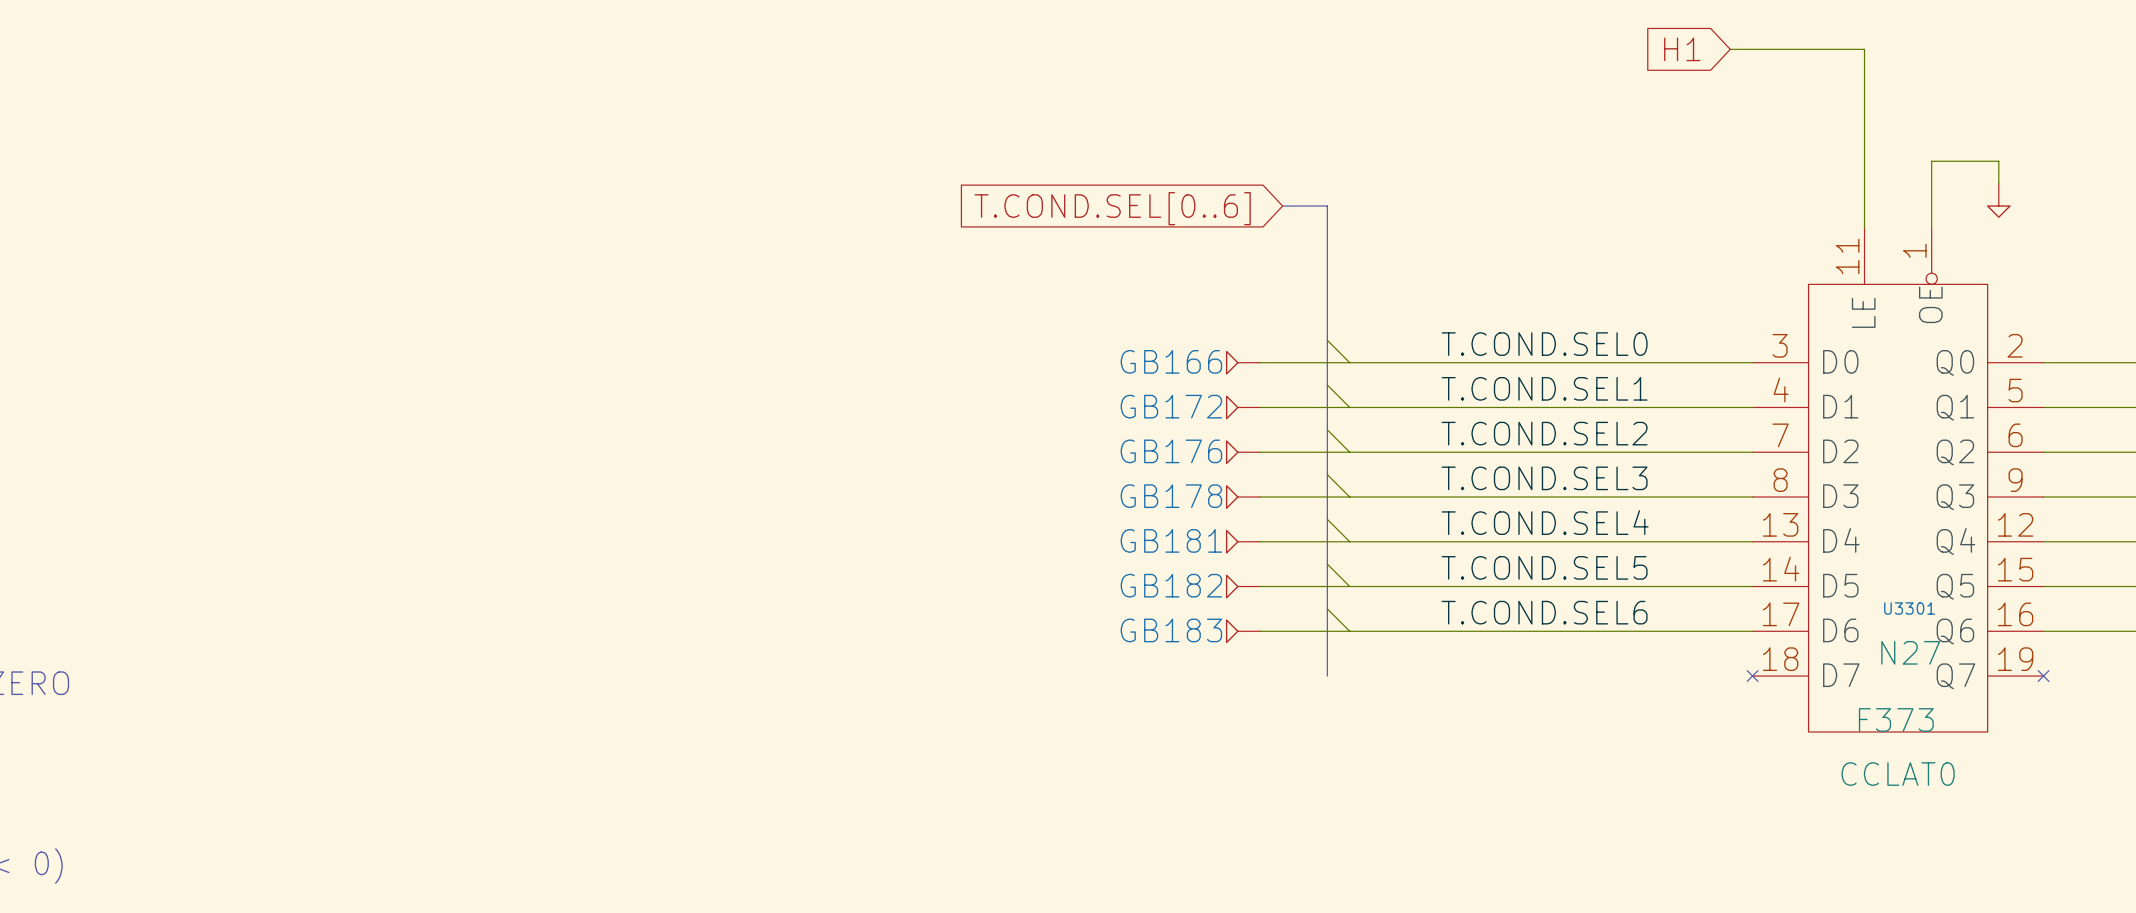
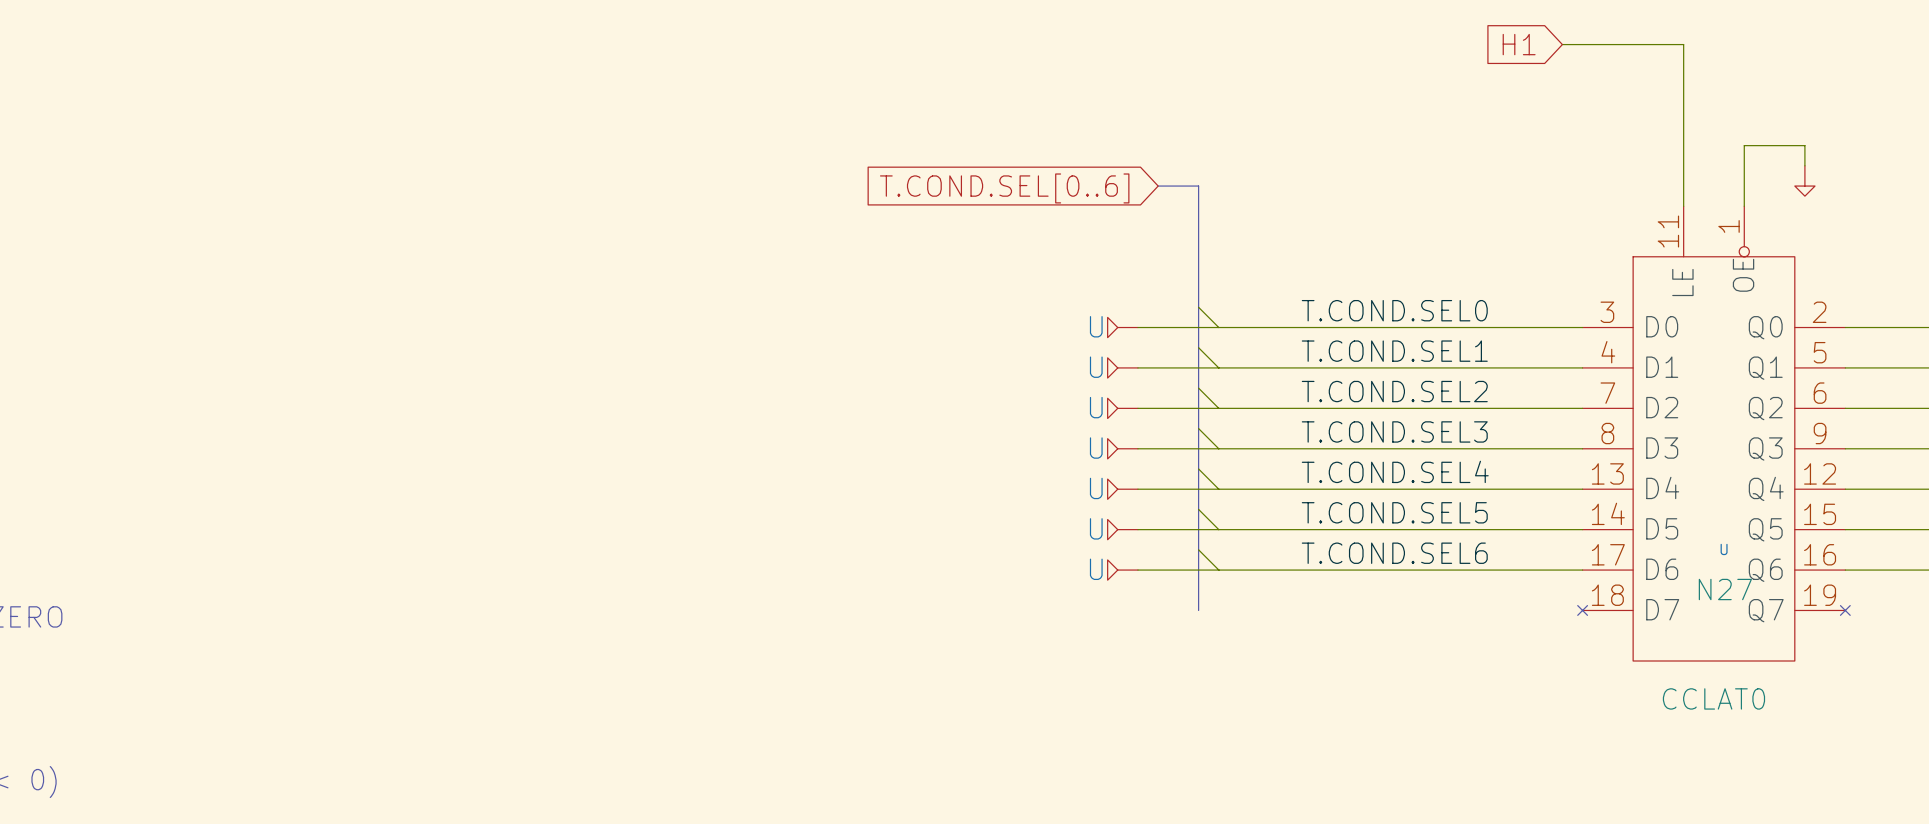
GB166 name: GB166 (1171, 361) -> U (1096, 326)
GB172 name: GB172 (1171, 406) -> U (1096, 367)
GB176 name: GB176 (1171, 451) -> U (1096, 407)
GB178 name: GB178 (1171, 496) -> U (1096, 448)
GB181 name: GB181 (1171, 540) -> U (1096, 488)
GB182 name: GB182 (1171, 585) -> U (1096, 528)
U3301 name: U3301 (1909, 608) -> U (1724, 549)
GB183 name: GB183 (1171, 630) -> U (1096, 569)
U3301 value: F373 (1896, 719) -> none

